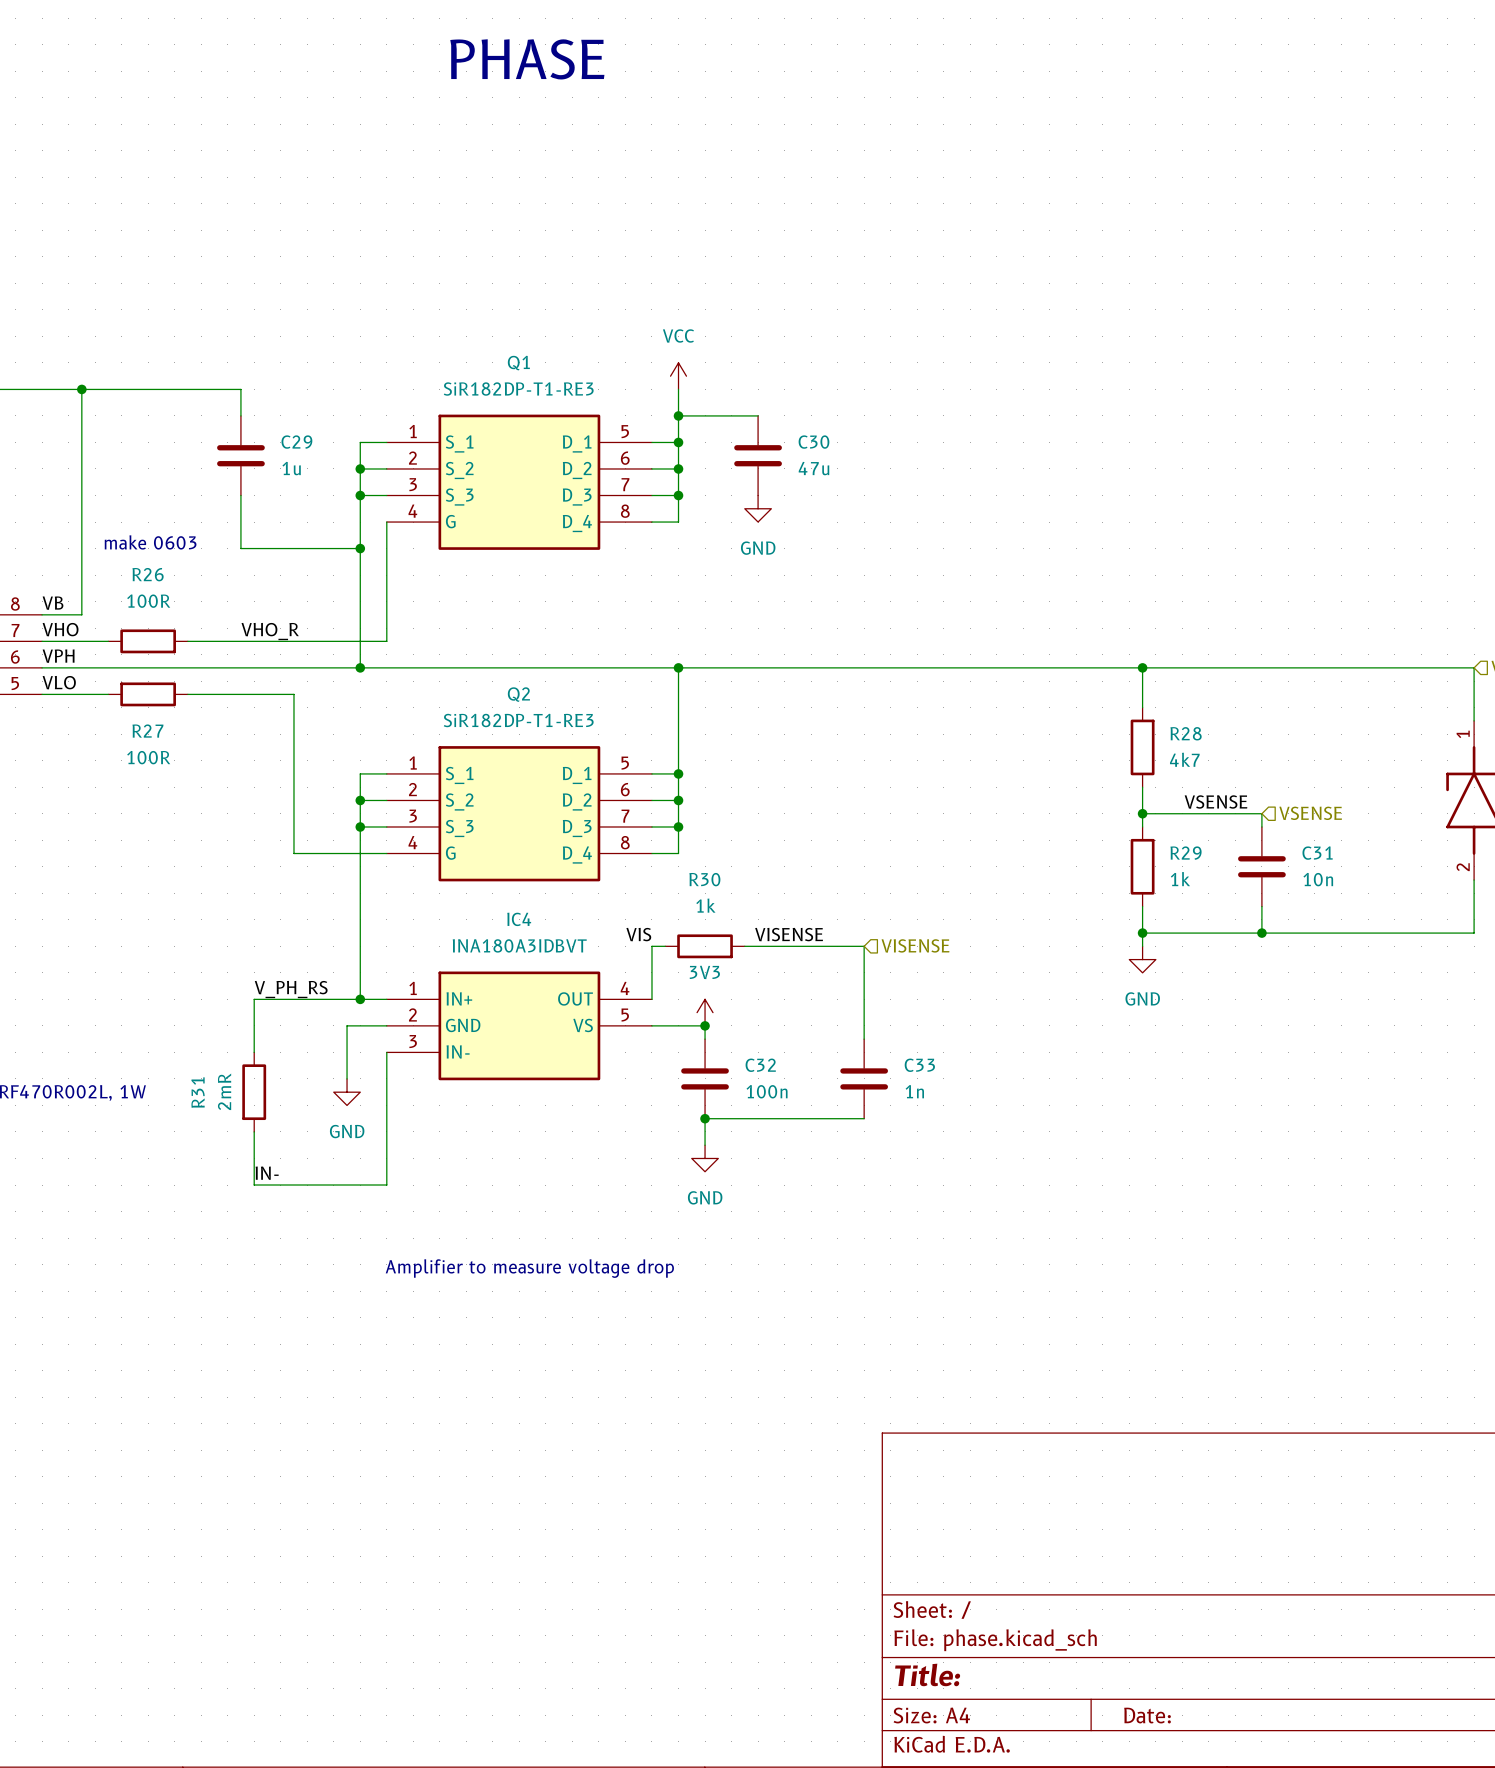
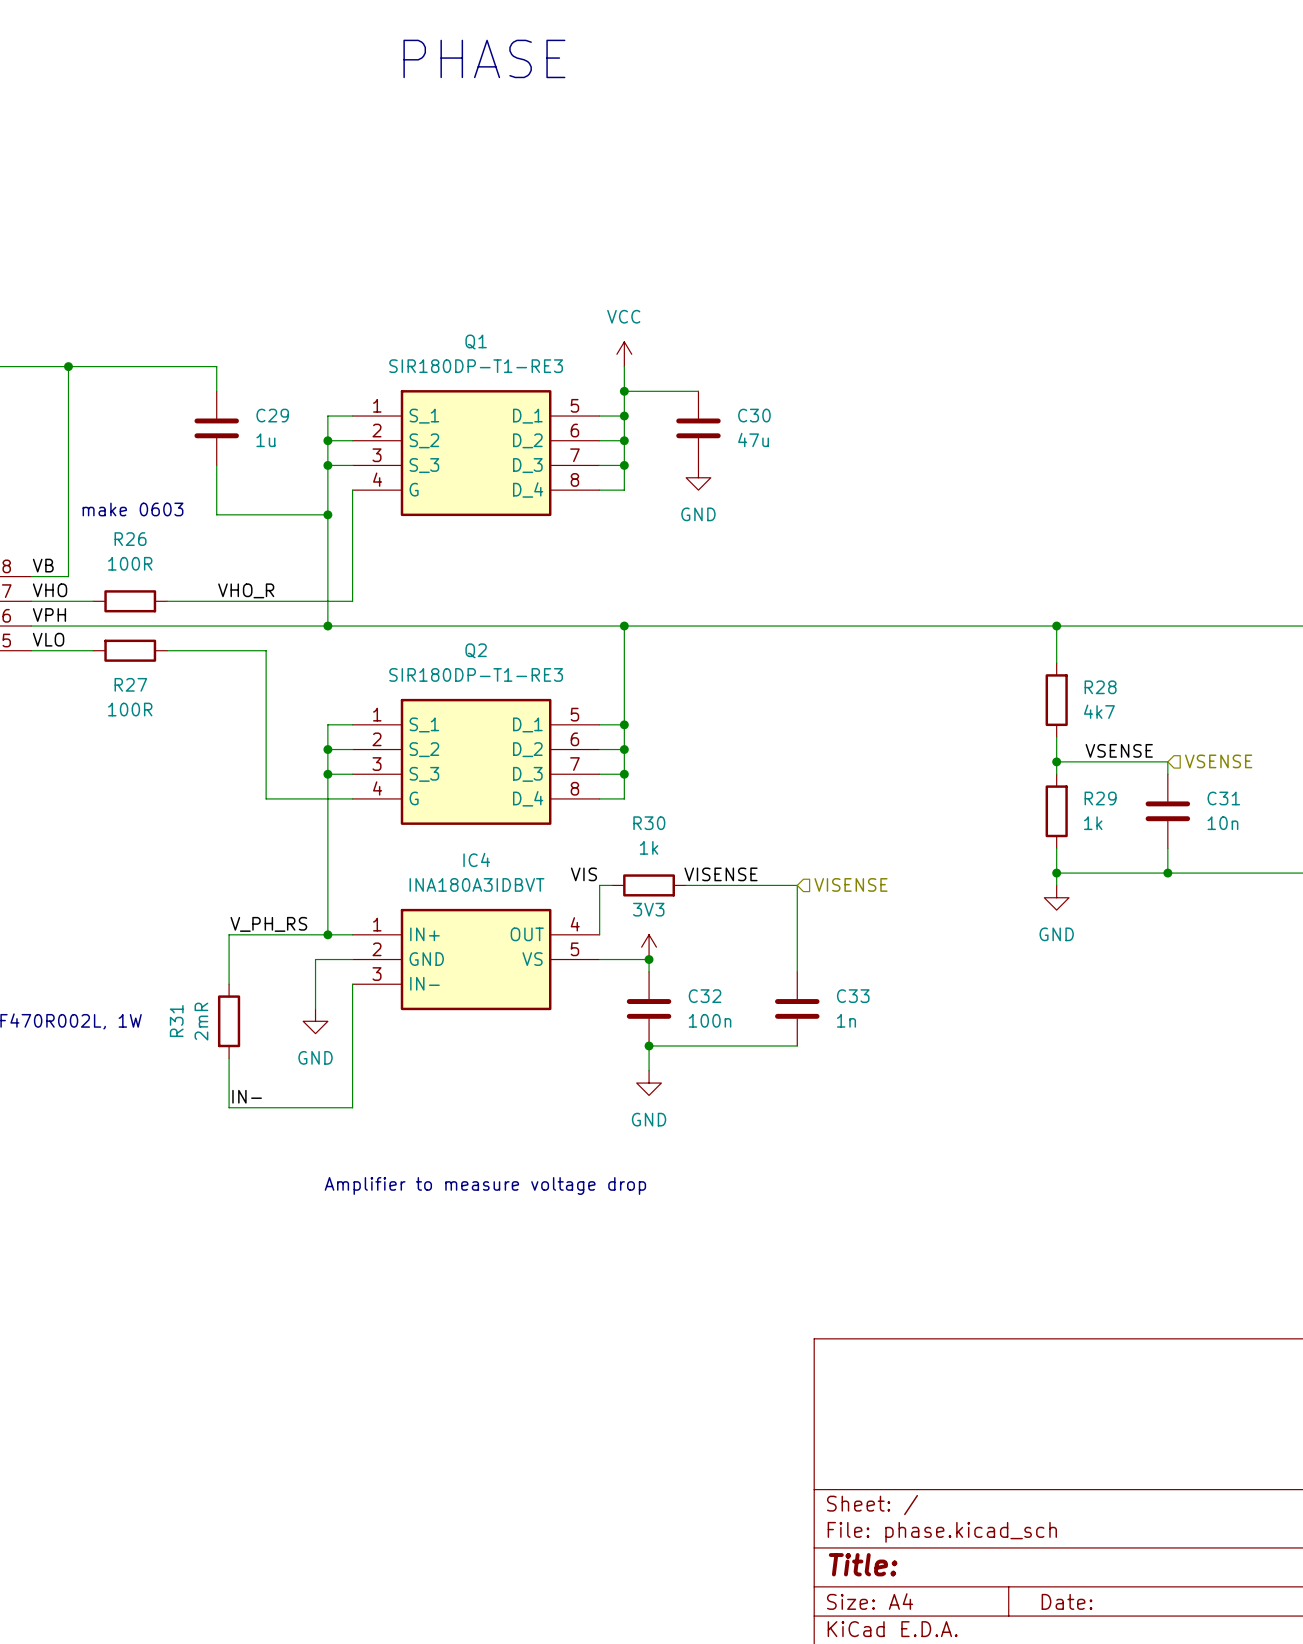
Q1 value: SiR182DP-T1-RE3 (518, 389) -> SIR180DP-T1-RE3 (476, 366)
Q2 value: SiR182DP-T1-RE3 (518, 720) -> SIR180DP-T1-RE3 (476, 674)

